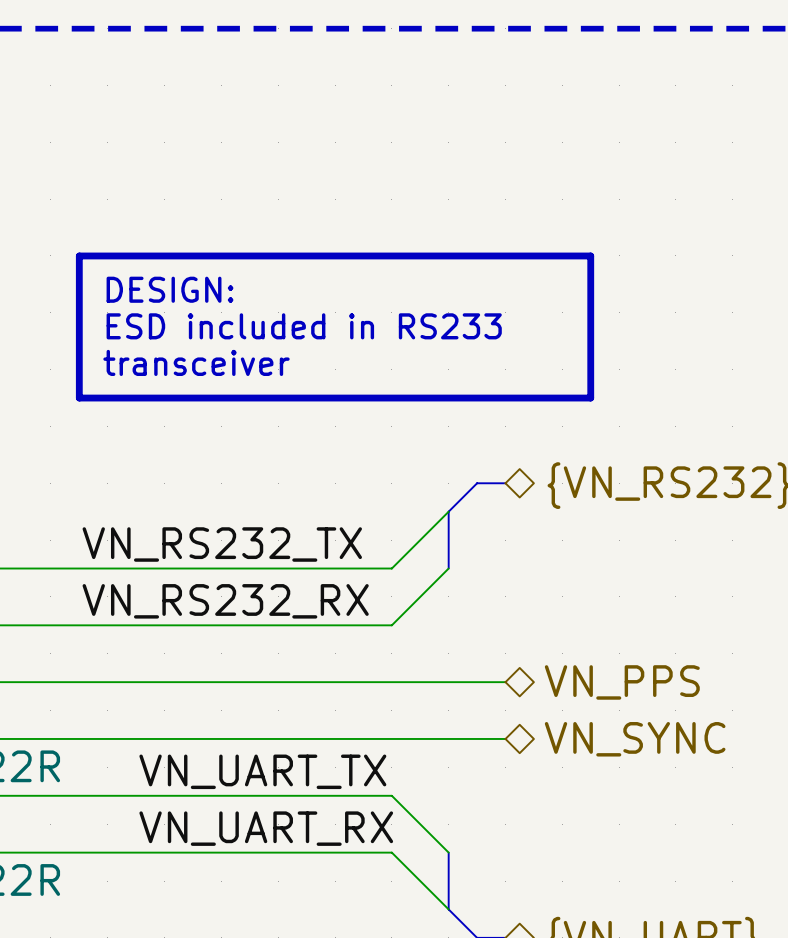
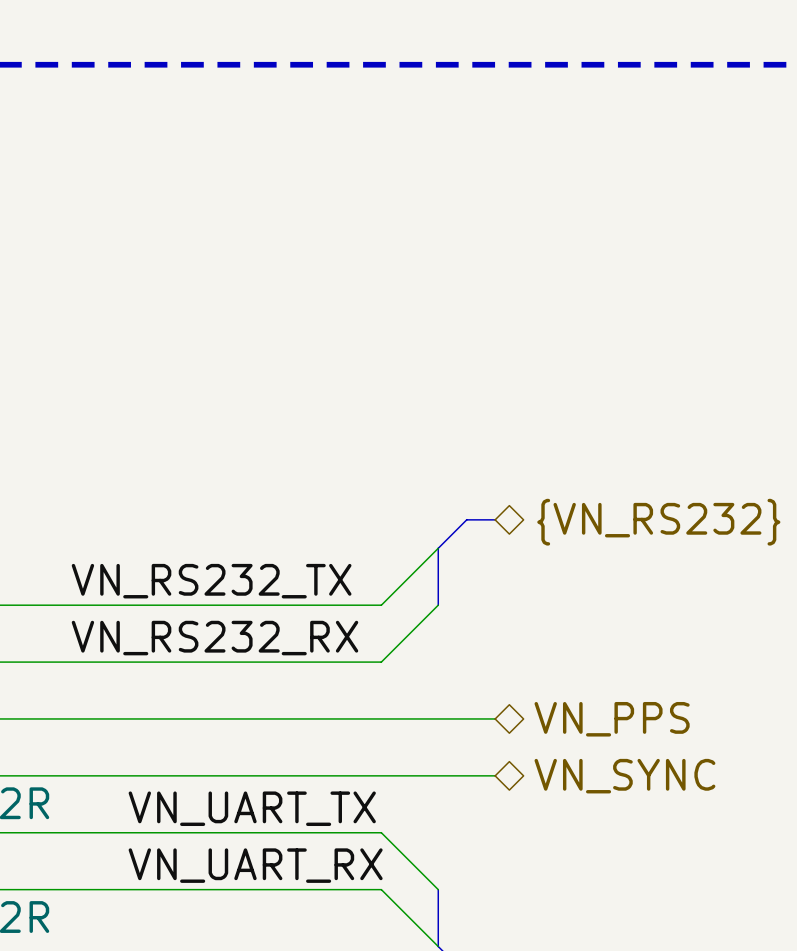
line: (79, 255) (590, 255) (590, 398) (79, 398) (79, 255) -> none
text: DESIGN: (169, 289) -> none
text: ESD included in RS233 (304, 326) -> none
text: transceiver (196, 362) -> none

